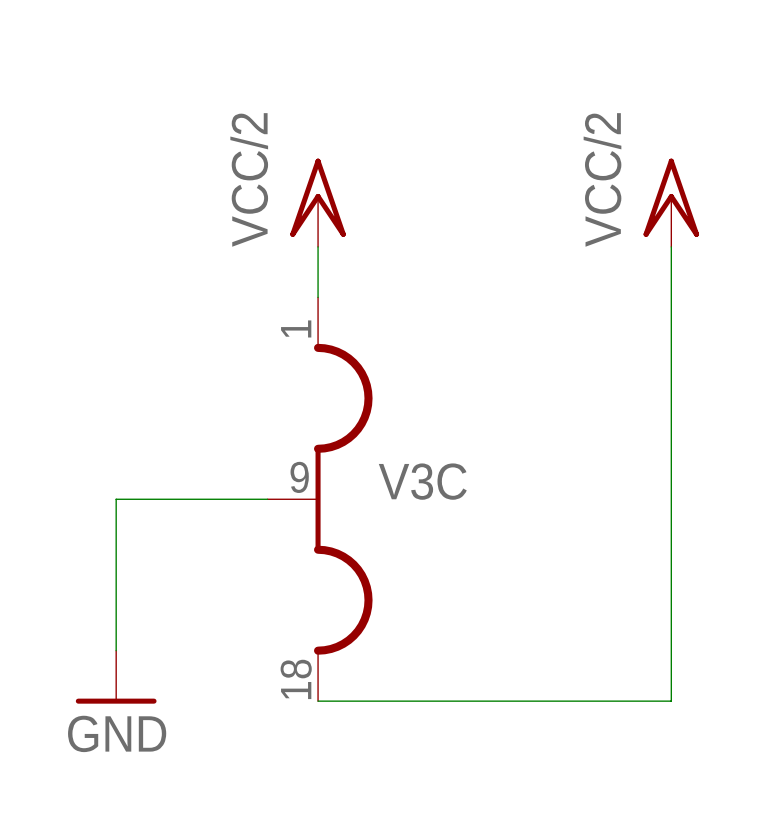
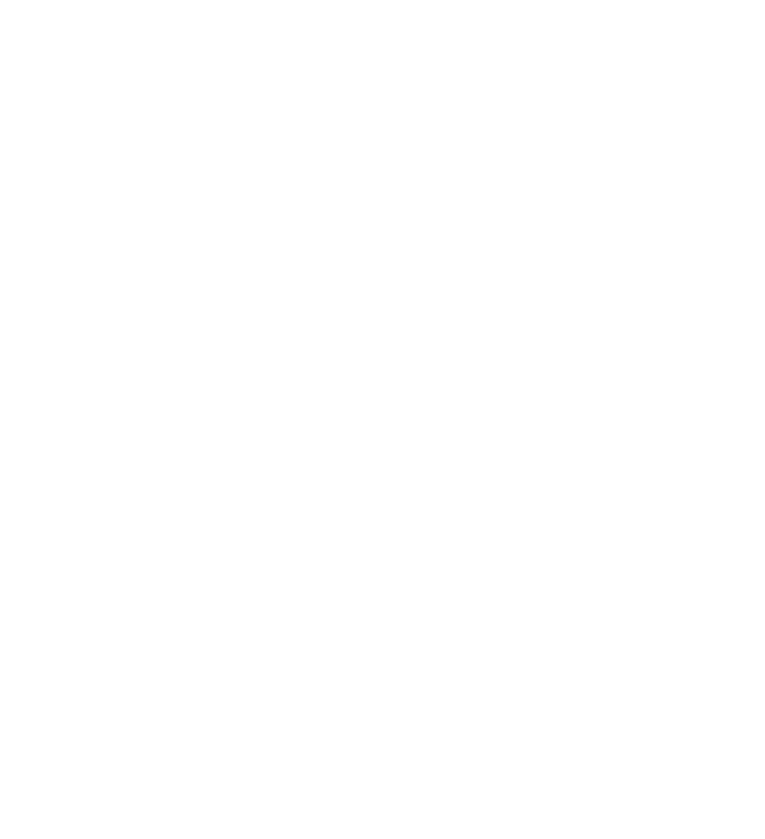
power symbol: VCC/2 (318, 202) -> none
power symbol: VCC/2 (671, 202) -> none
wire: (318, 246) (318, 297) -> none
wire: (671, 246) (671, 701) (318, 701) -> none
wire: (267, 499) (116, 499) (116, 650) -> none
V3C: (320, 499) -> none
power symbol: GND (116, 677) -> none

